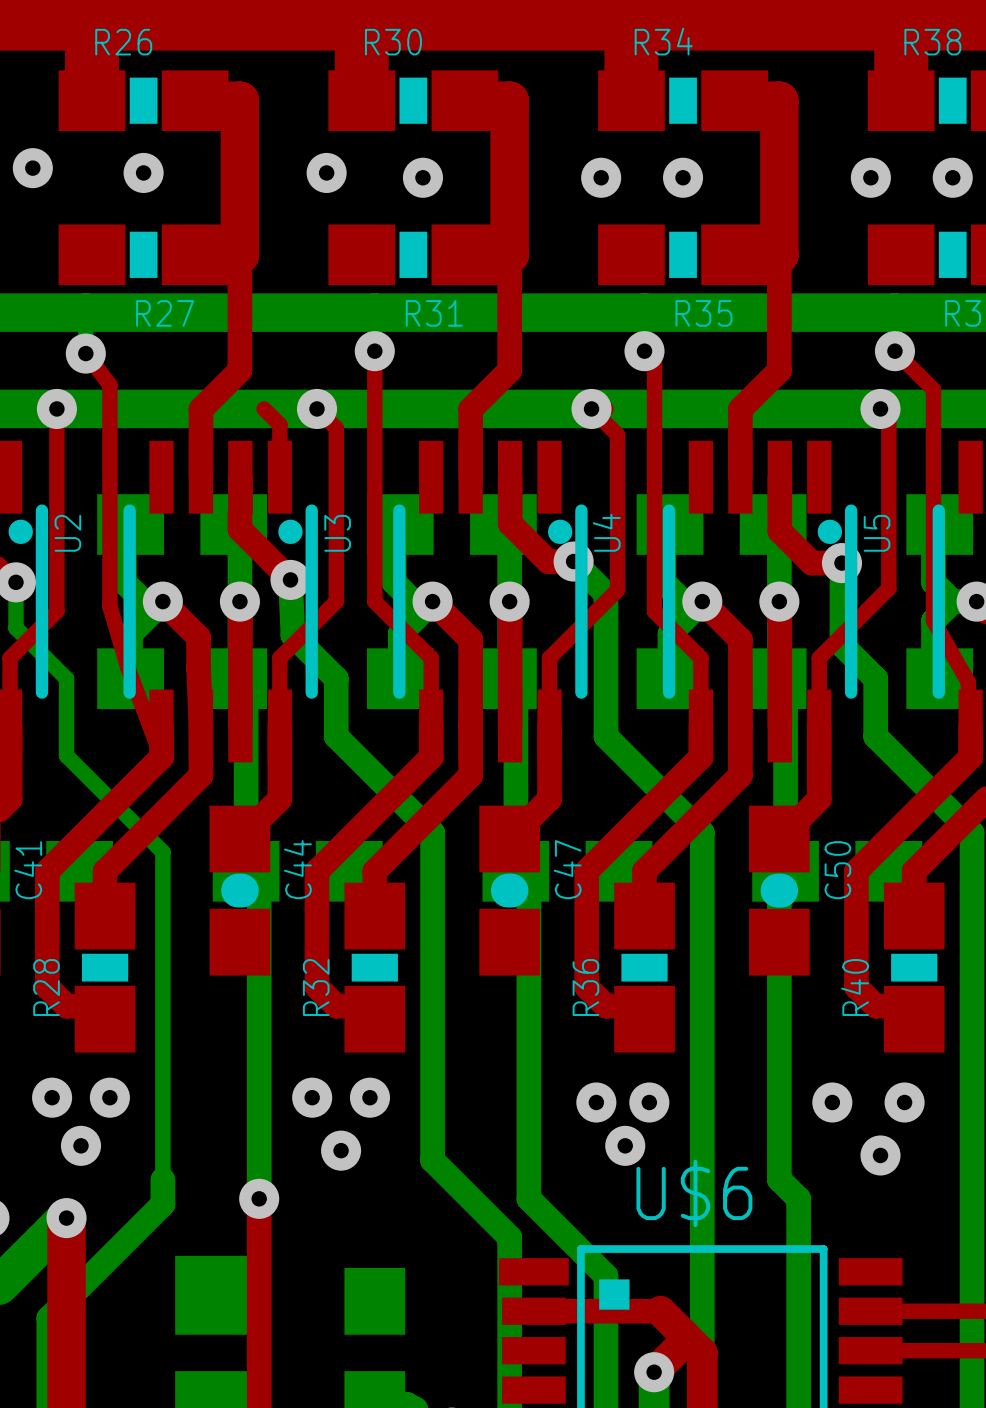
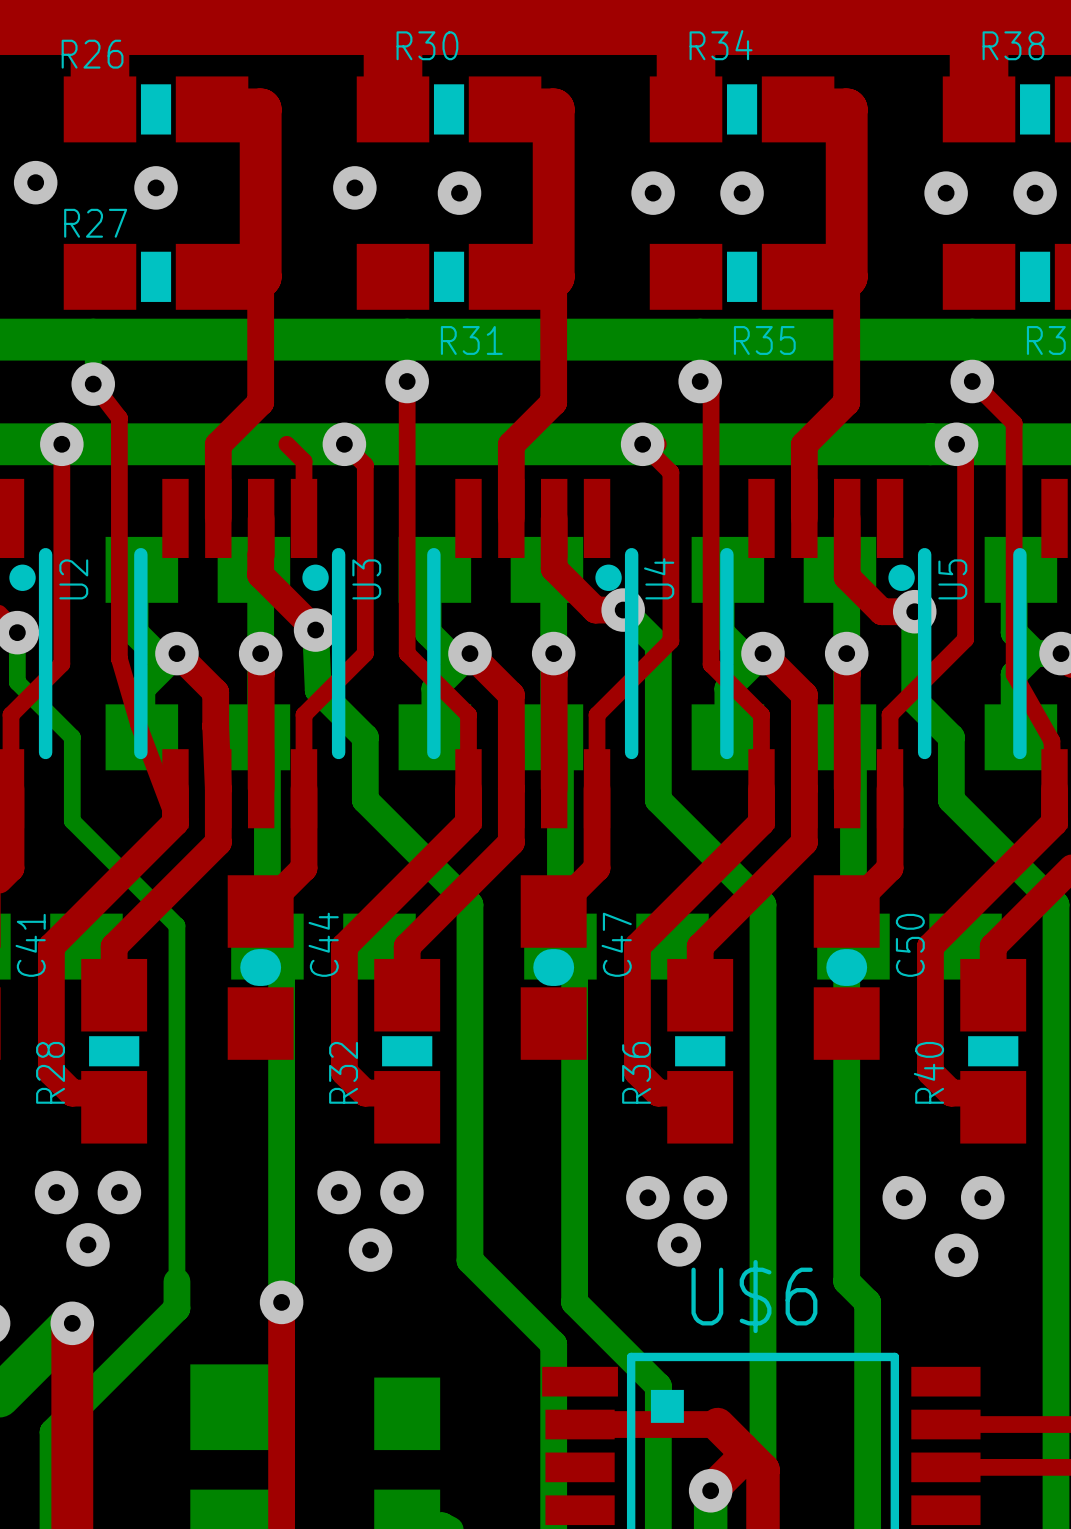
R26 name position: R26 (123, 42) -> R26 (92, 54)
R27 name position: R27 (165, 313) -> R27 (95, 223)

